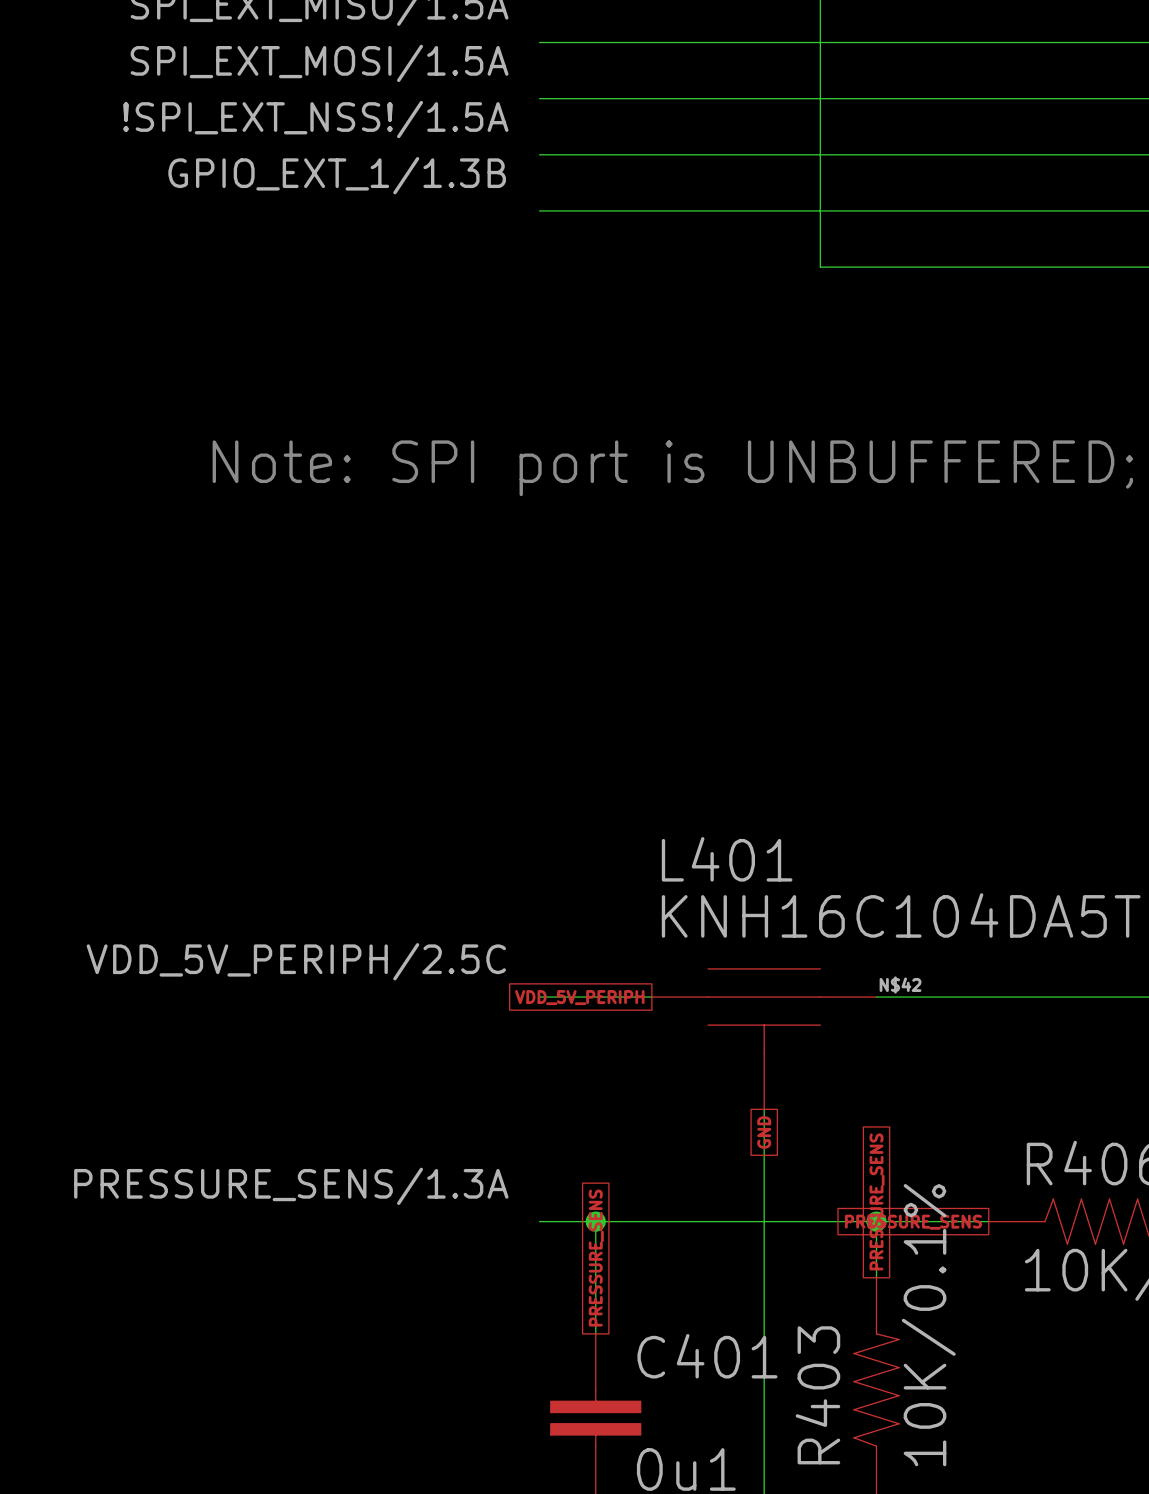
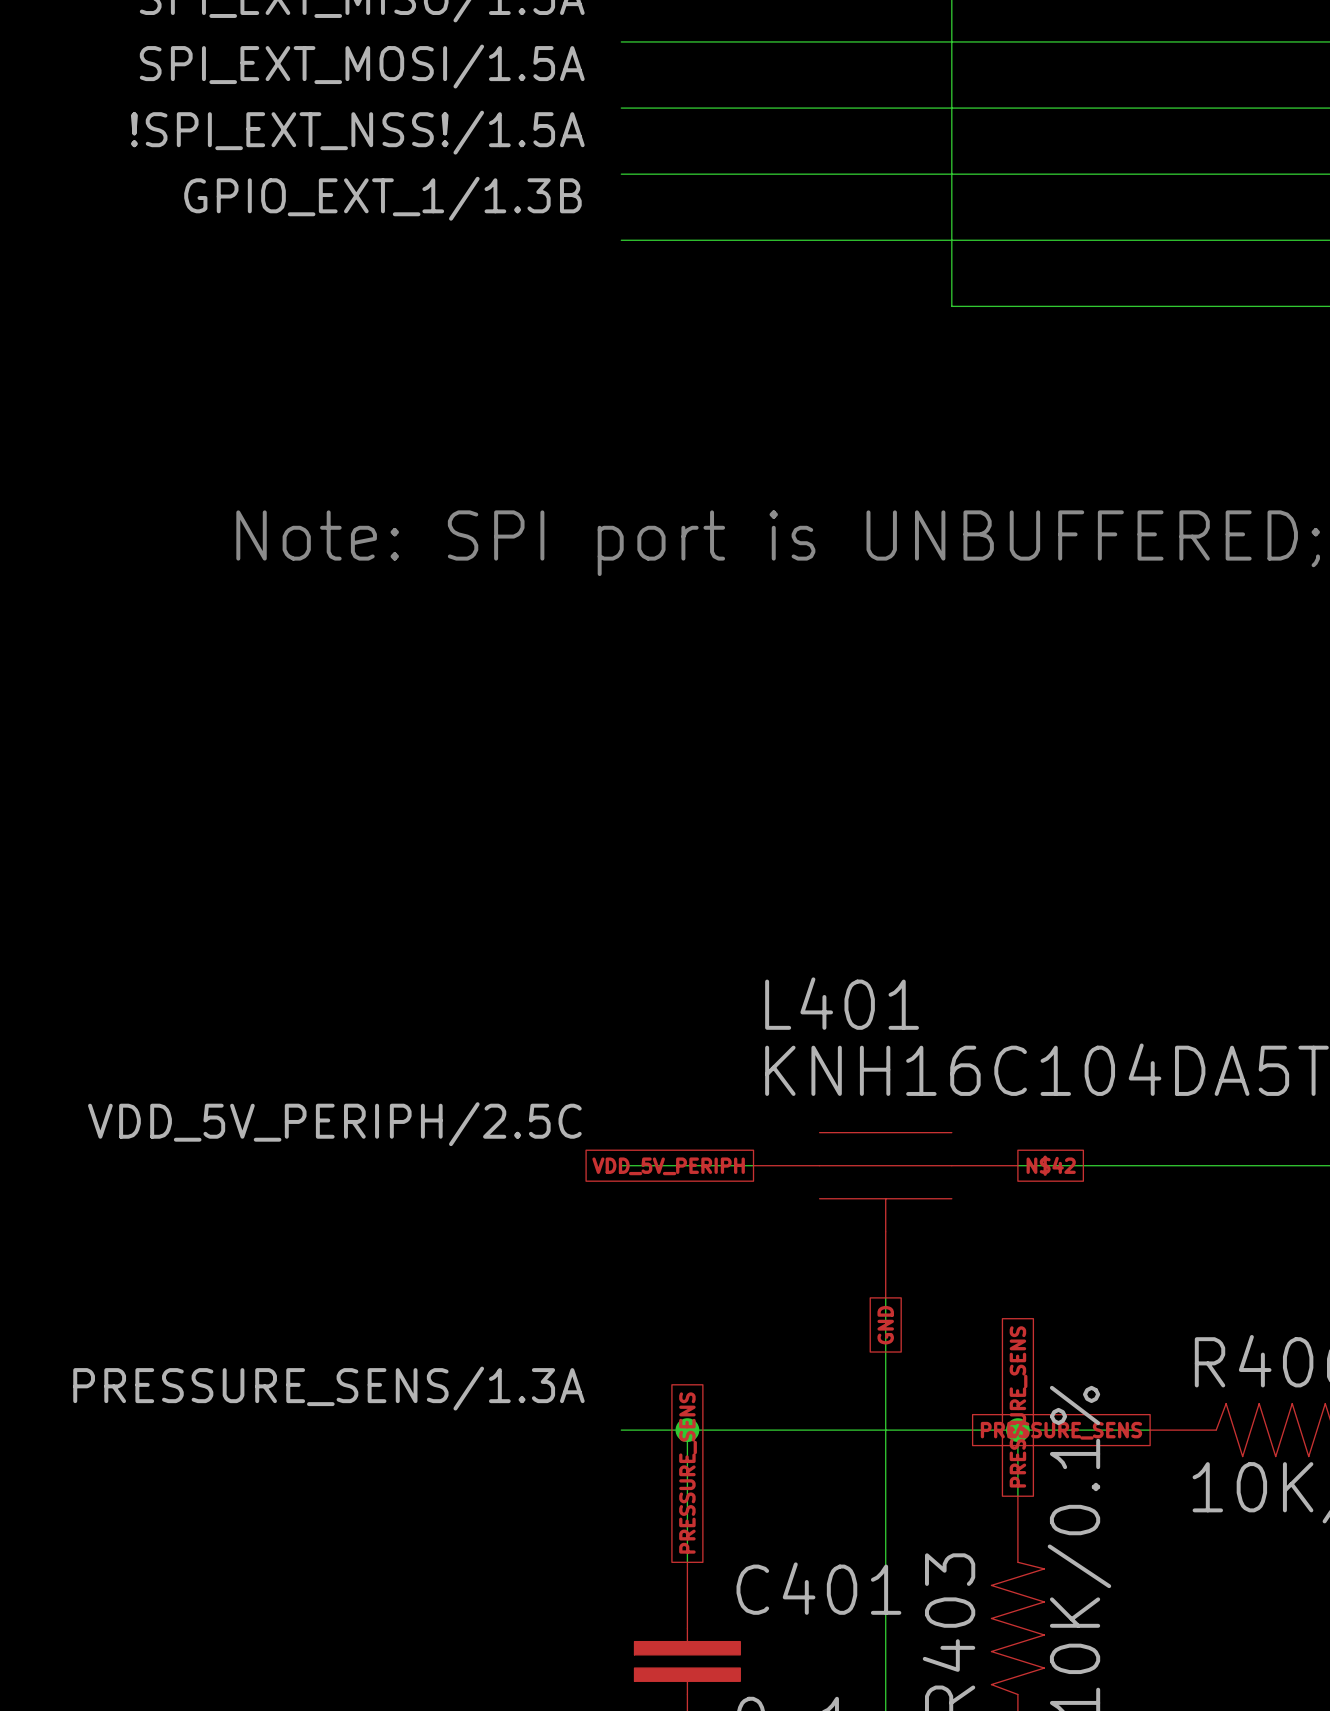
label: N$42 (900, 984) -> none
global label: none -> N$42 (1051, 1165)

